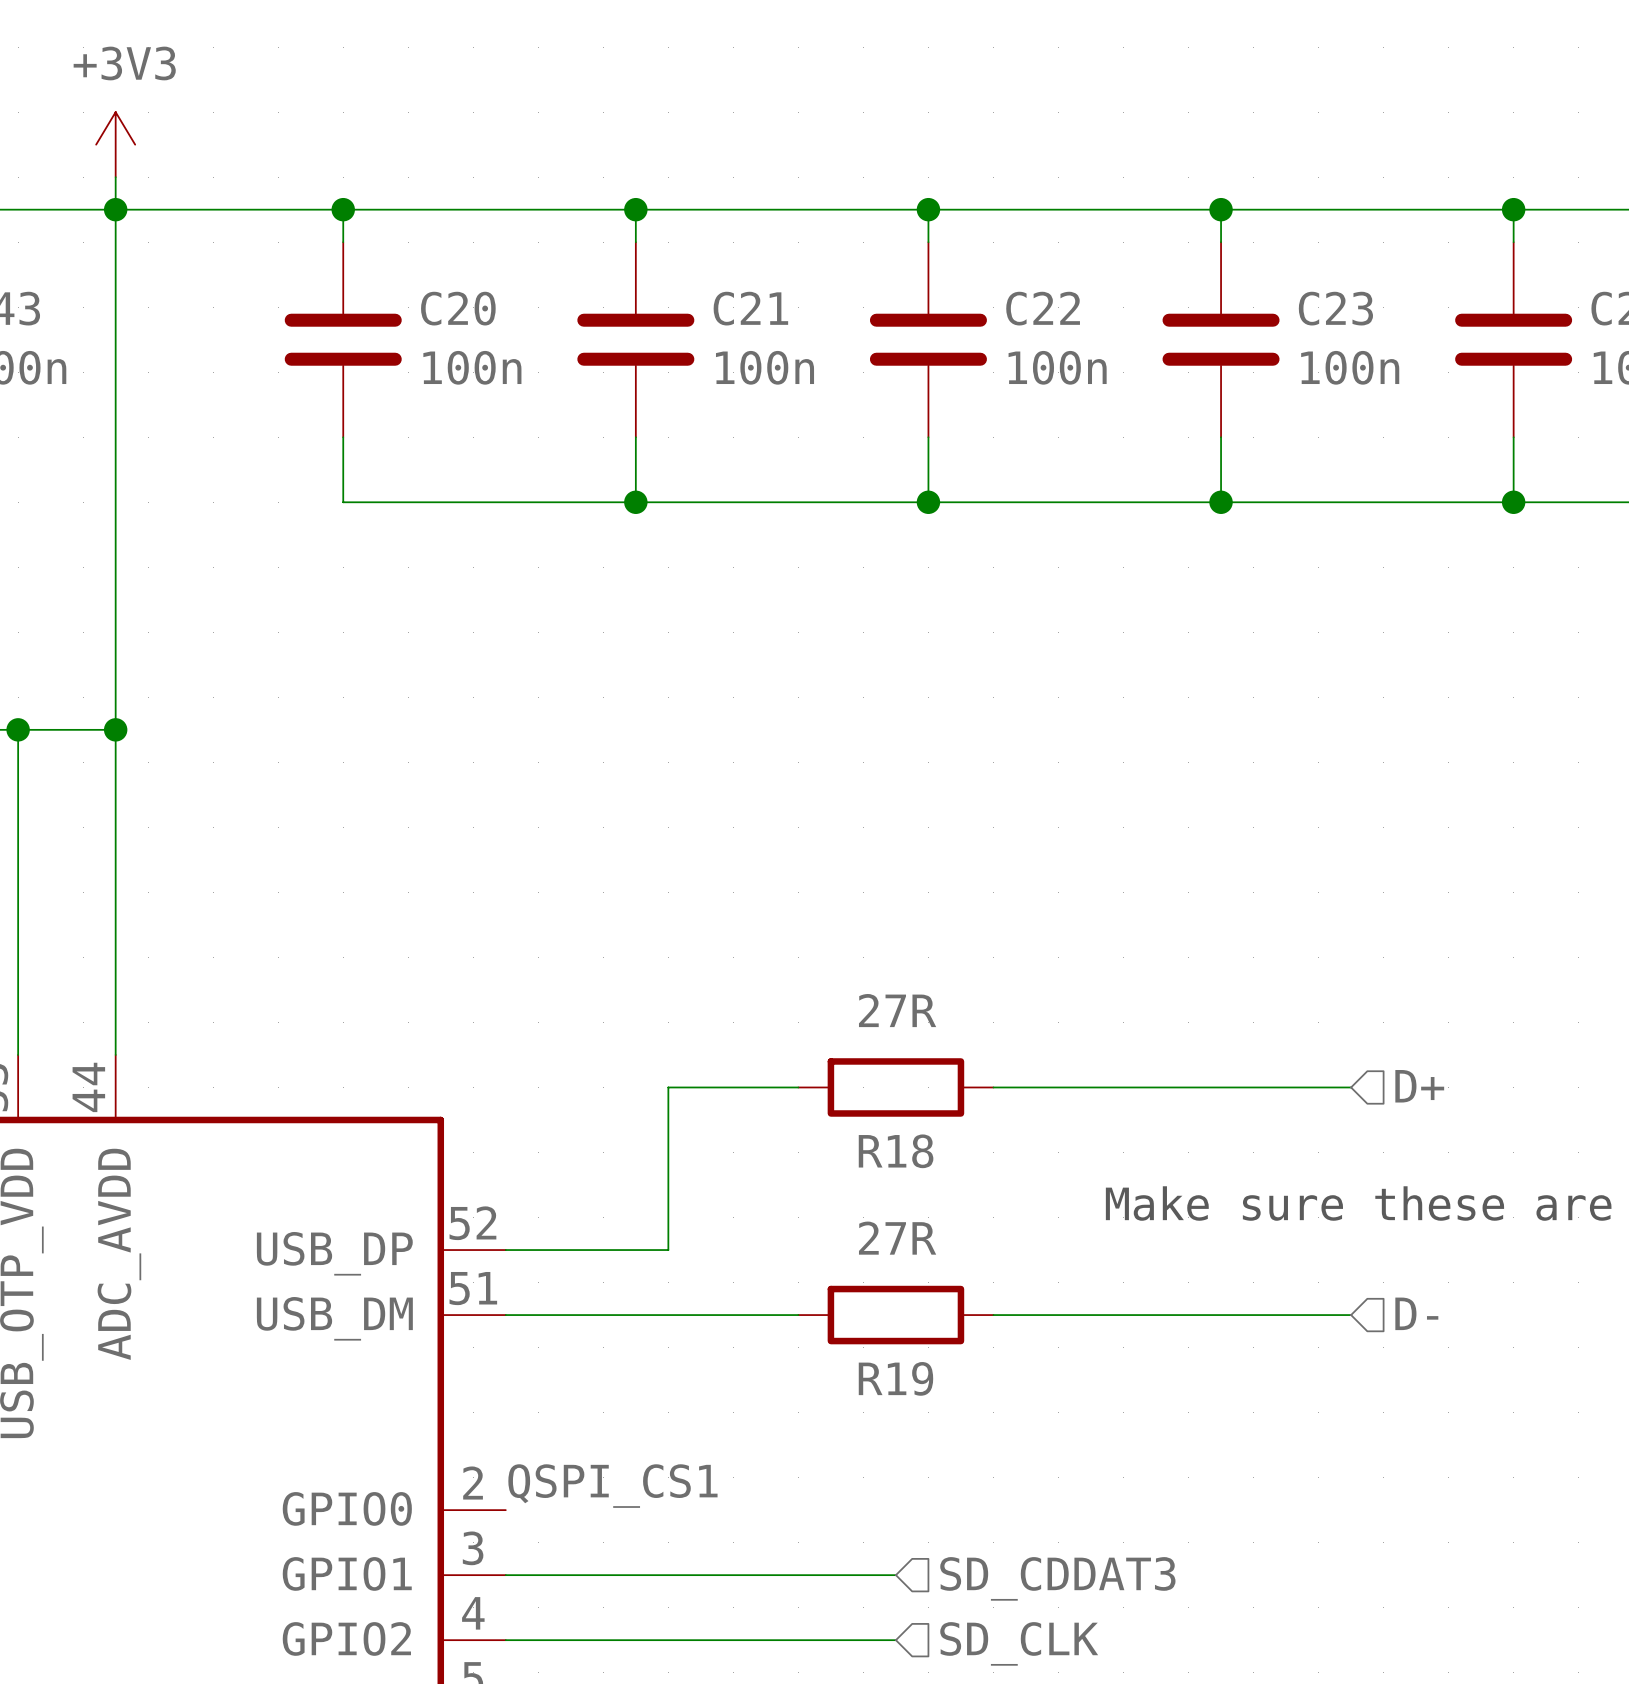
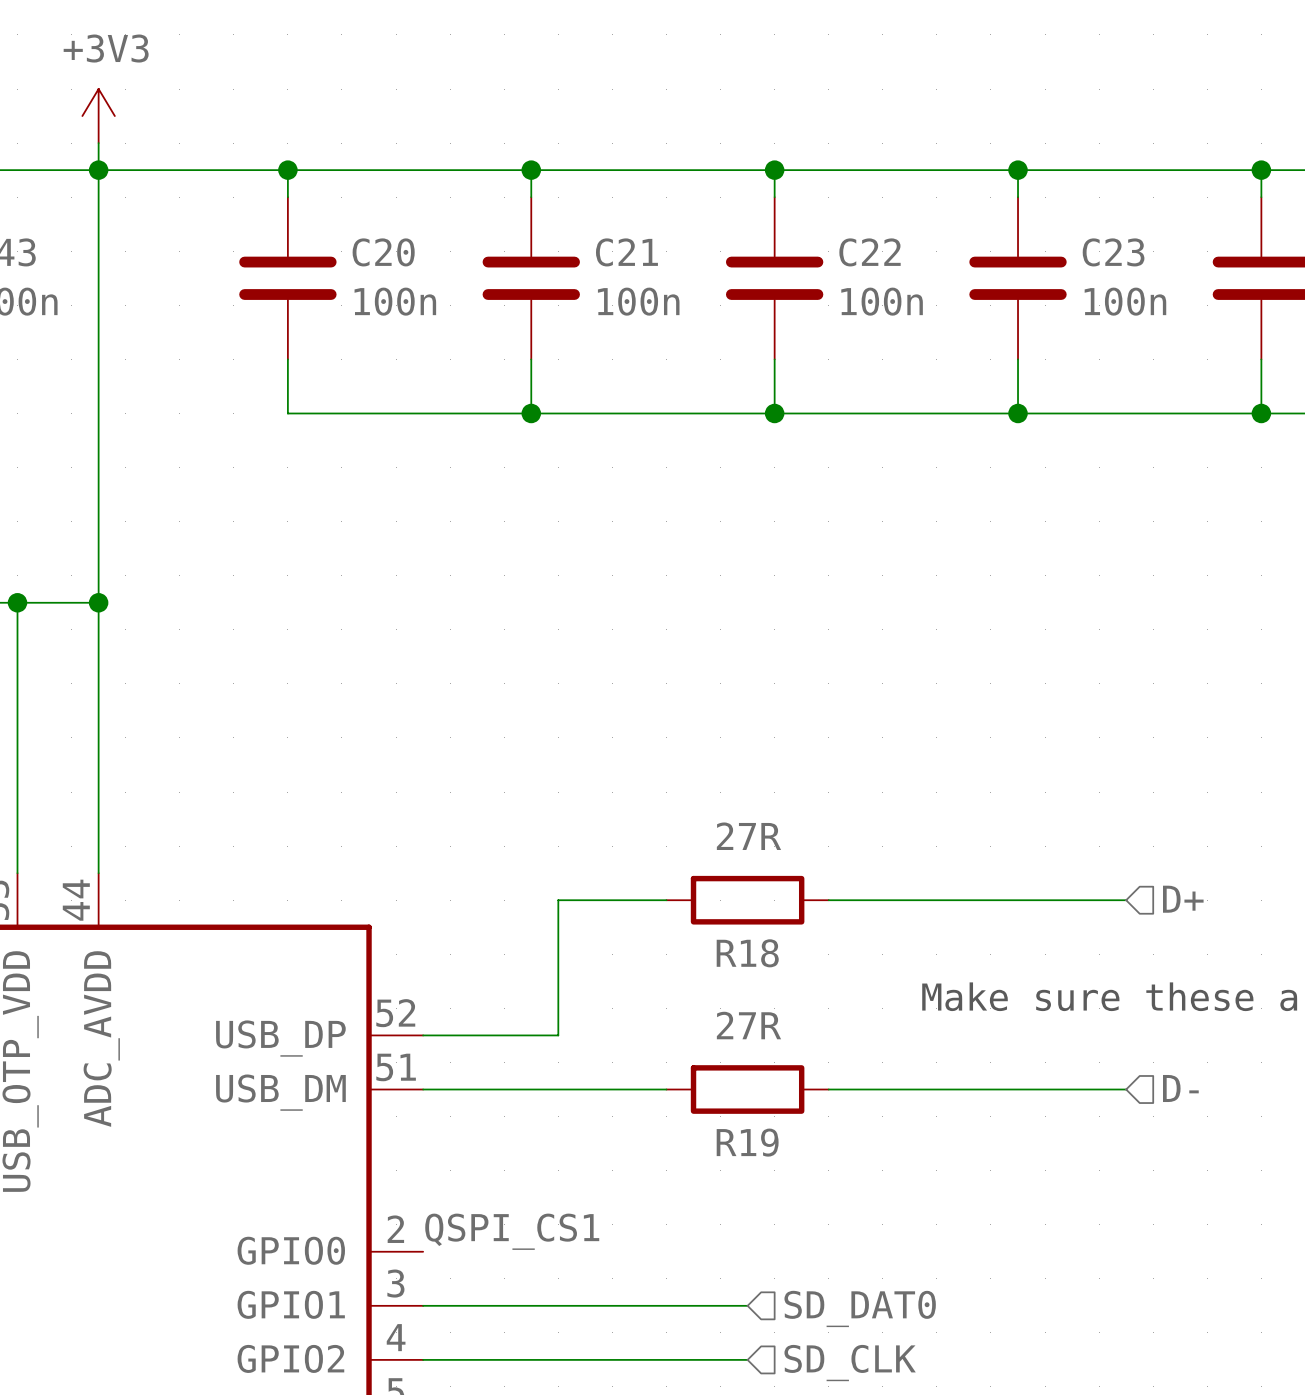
hierarchical label: SD_CDDAT3 (1057, 1578) -> SD_DAT0 (860, 1308)

